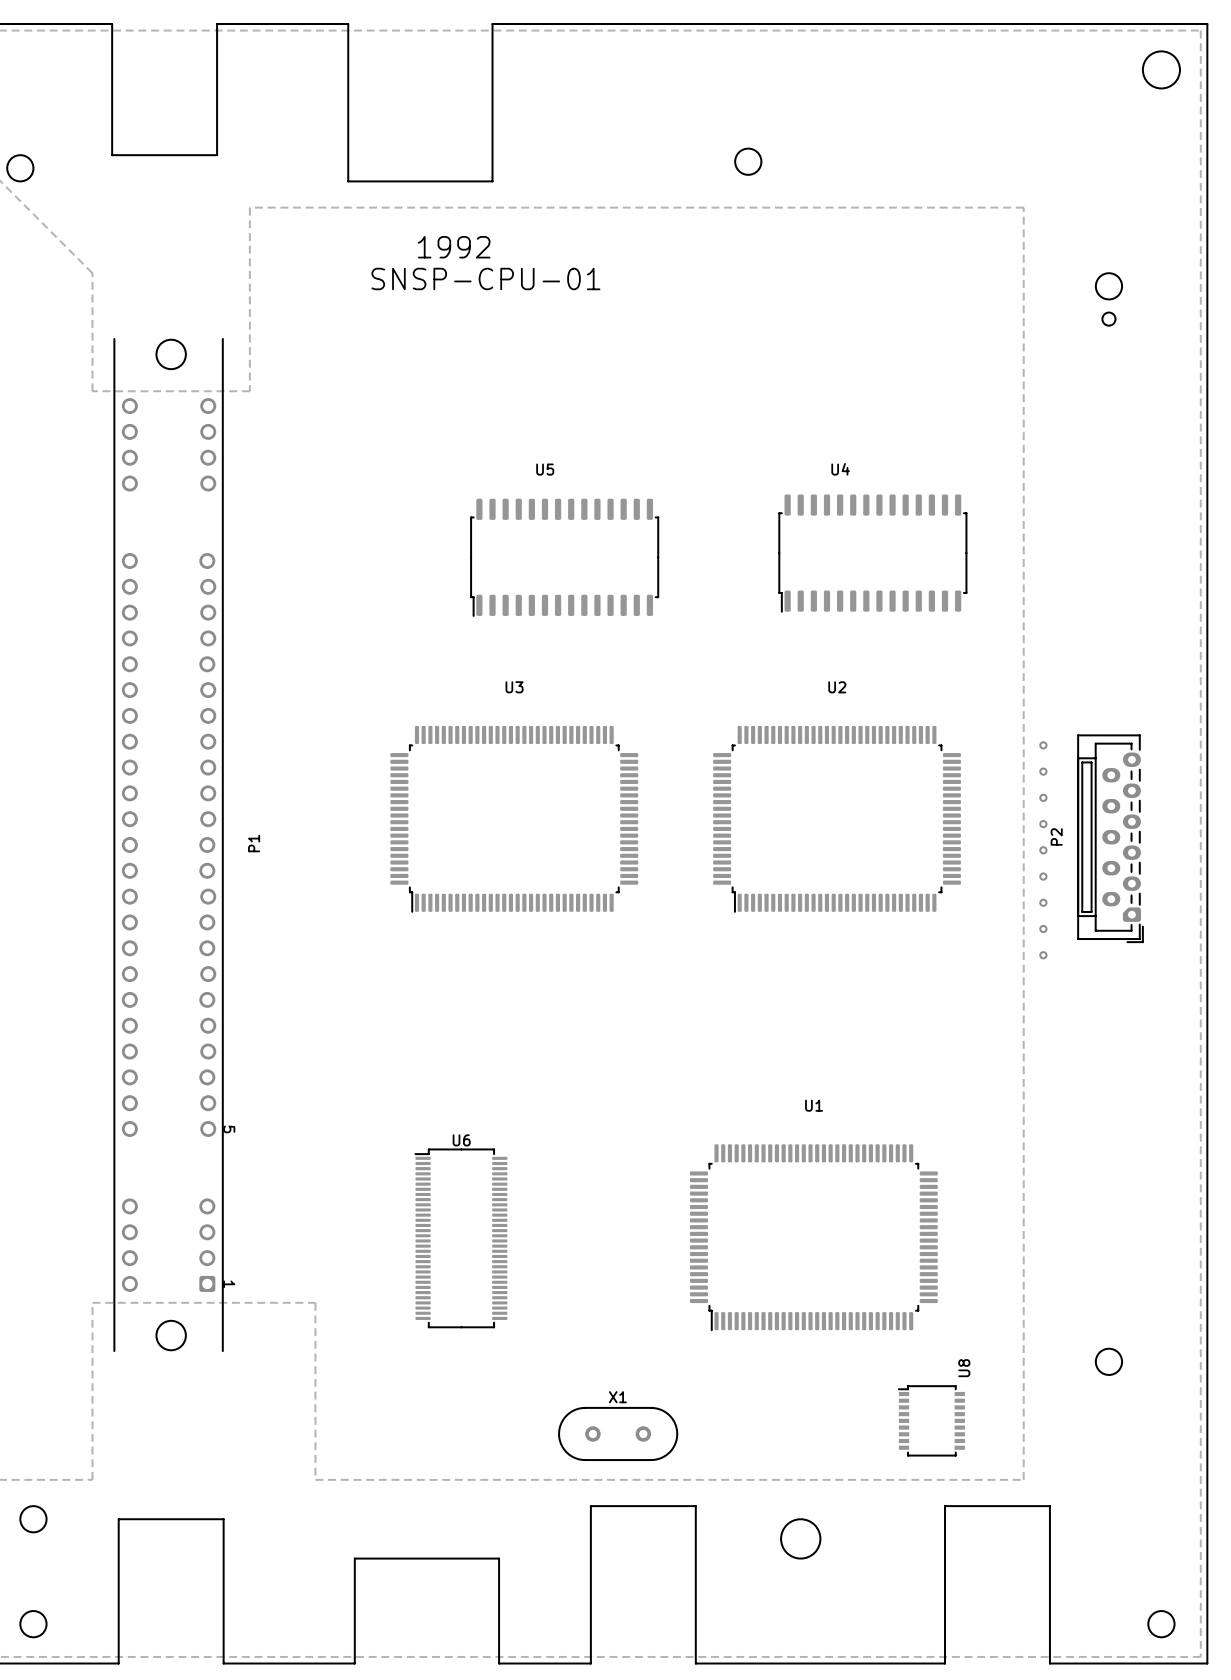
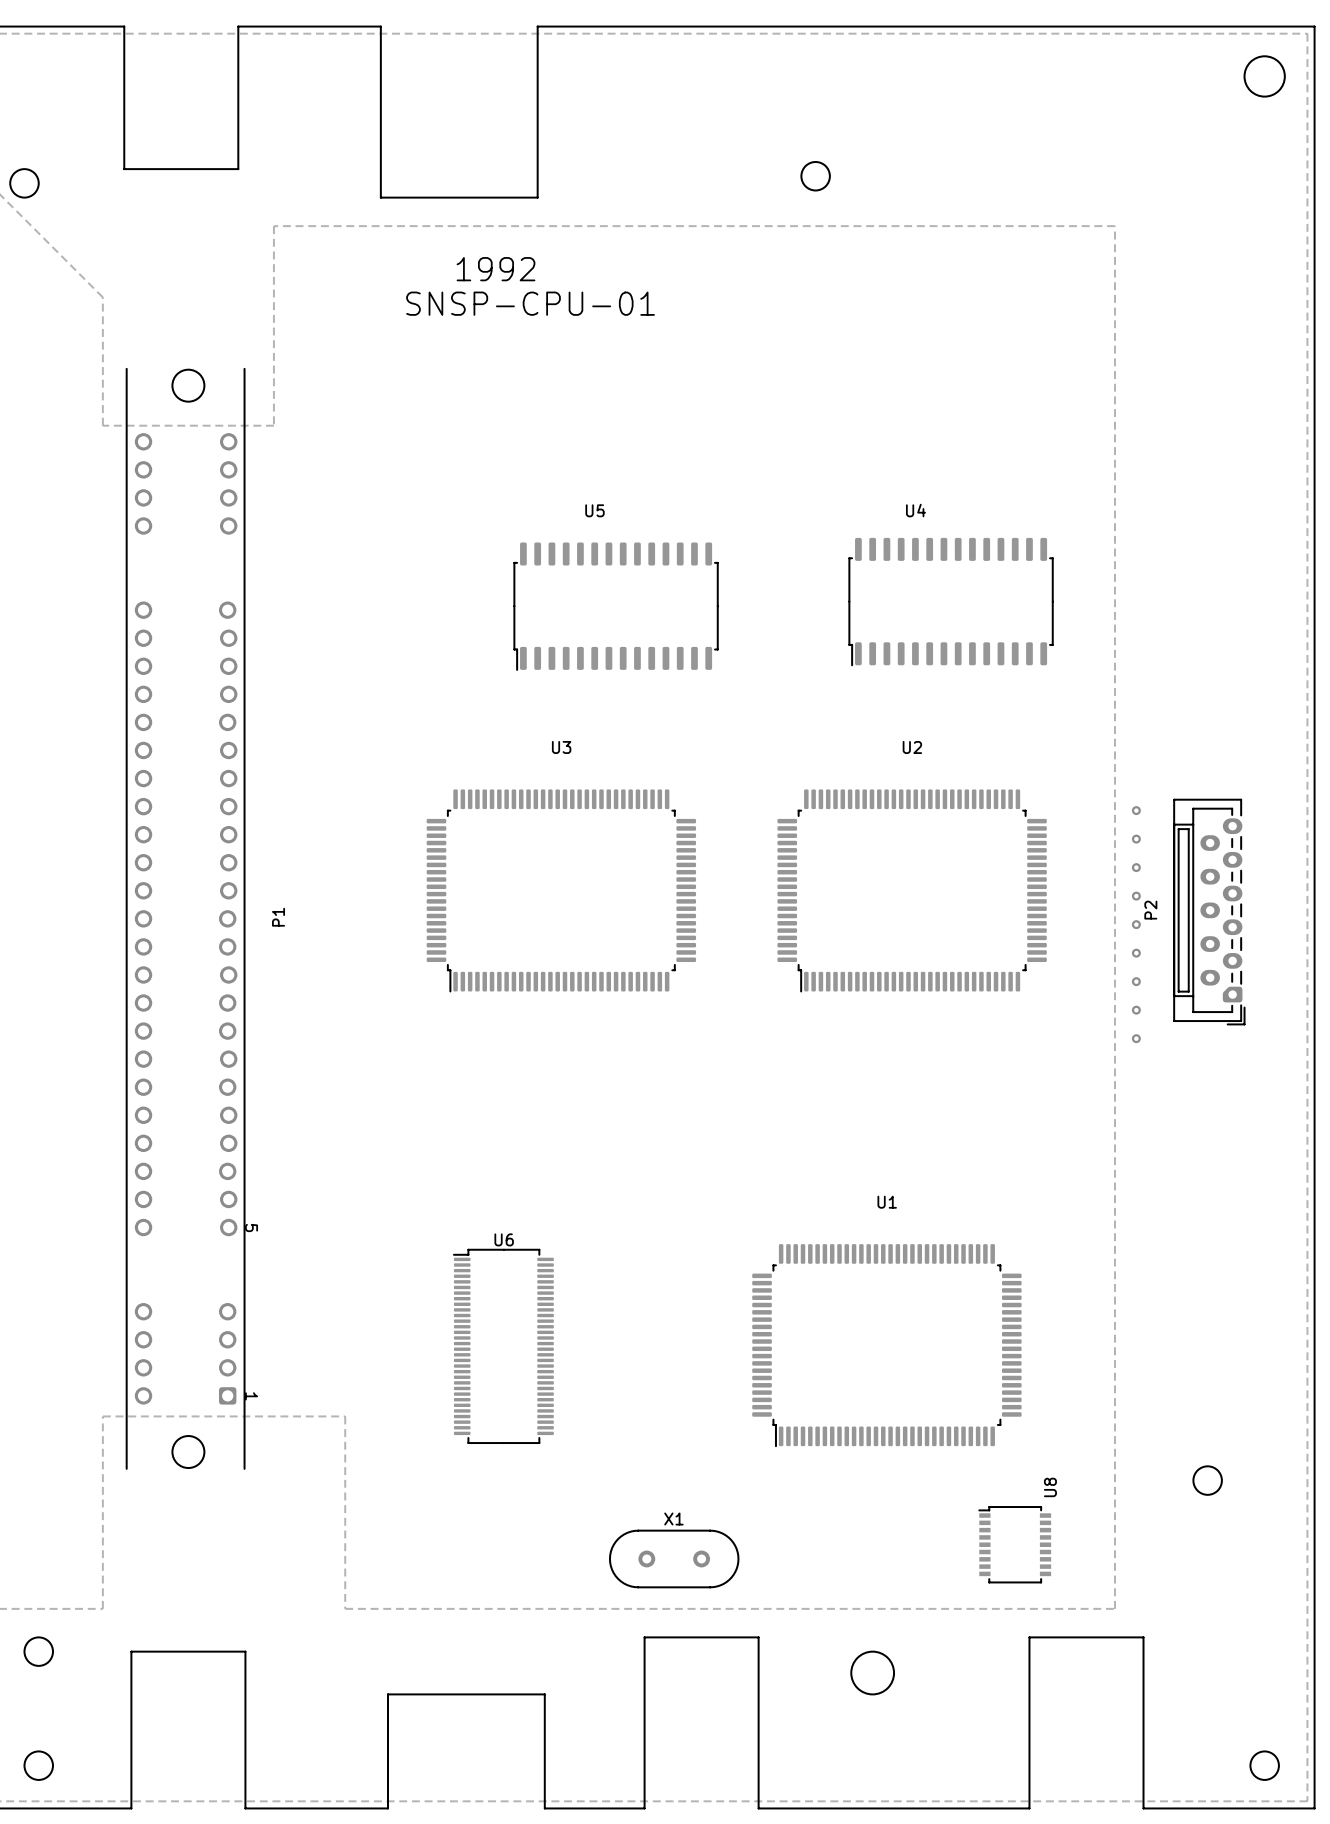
round board edge: [1095, 272, 1123, 300] -> none
round board edge: [1101, 312, 1117, 327] -> none

